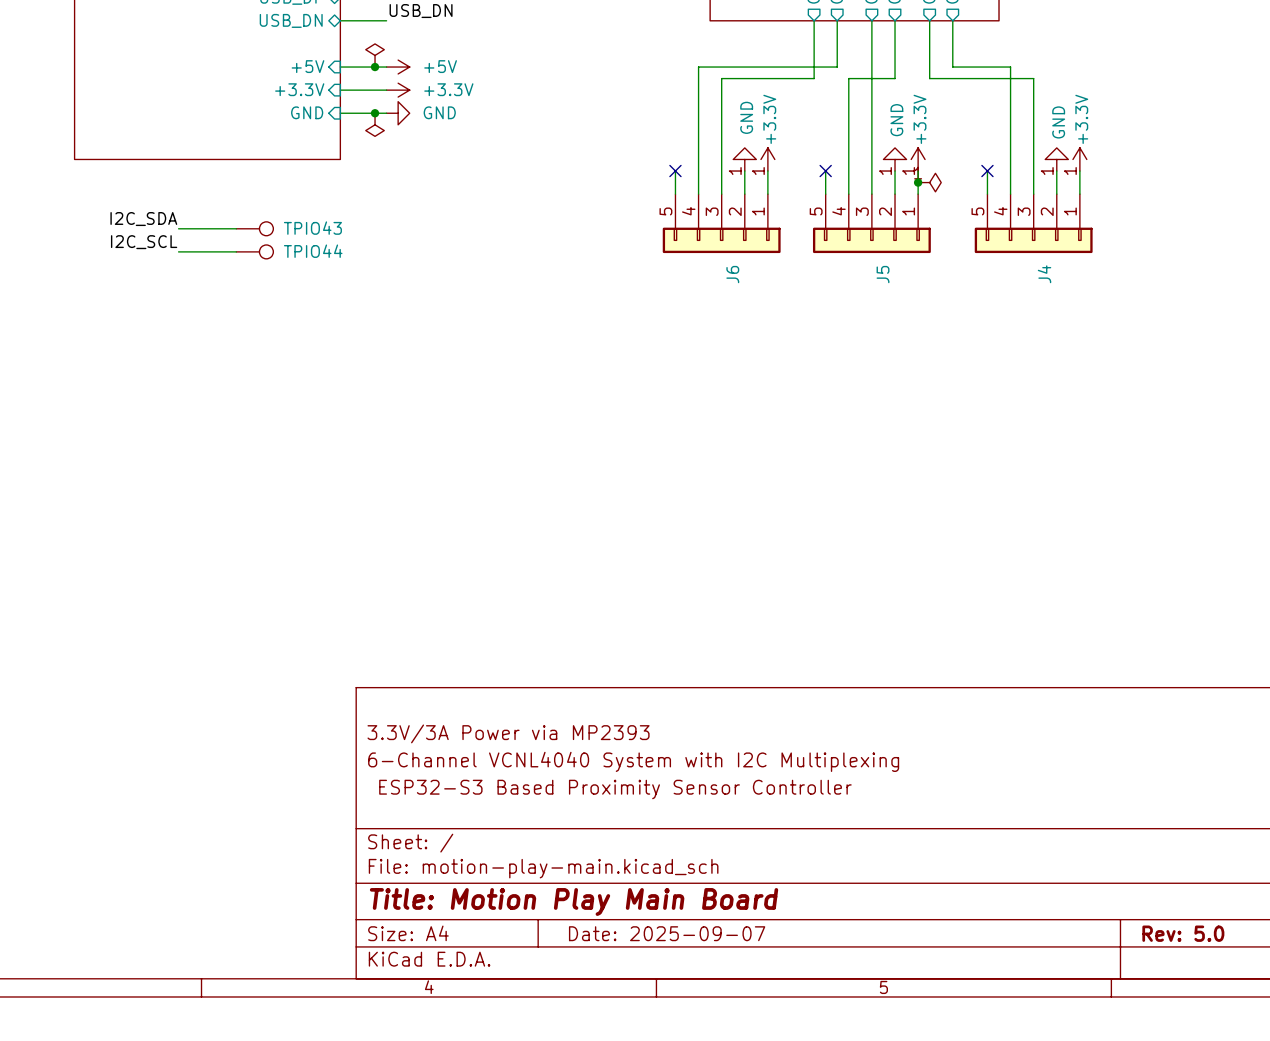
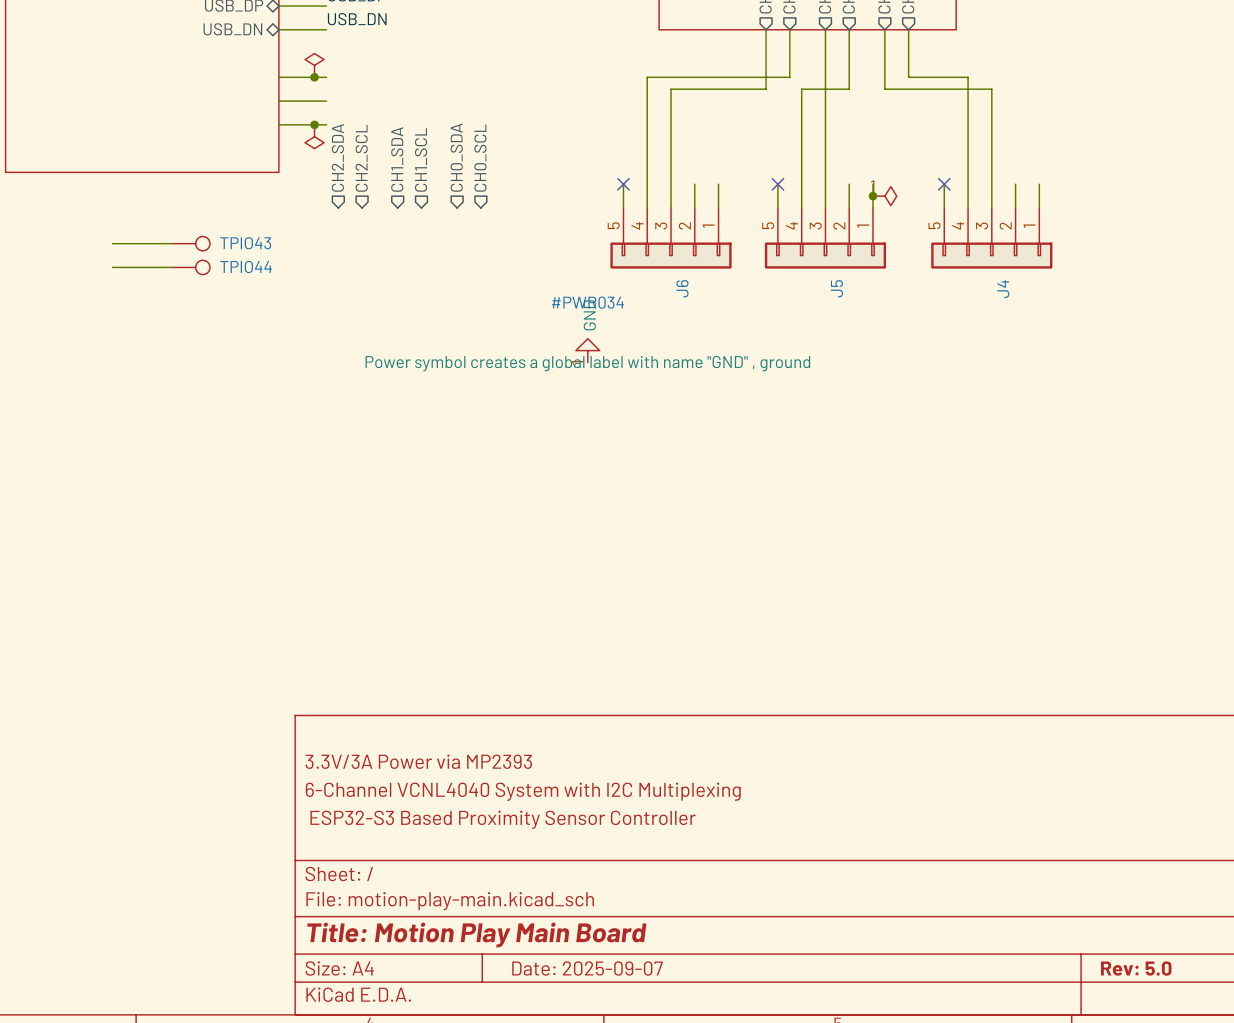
sheet pin: +5V (307, 66) -> none
power symbol: +5V (398, 67) -> none
sheet pin: +3.3V (299, 89) -> none
power symbol: +3.3V (398, 90) -> none
sheet pin: GND (307, 112) -> none
power symbol: GND (398, 113) -> none
sheet pin: none -> CH2_SDA (337, 157)
sheet pin: none -> CH2_SCL (361, 158)
sheet pin: none -> CH1_SDA (397, 159)
sheet pin: none -> CH1_SCL (421, 159)
sheet pin: none -> CH0_SDA (456, 157)
sheet pin: none -> CH0_SCL (480, 158)
power symbol: GND (744, 159) -> none
power symbol: +3.3V (767, 159) -> none
power symbol: GND (895, 159) -> none
power symbol: +3.3V (918, 159) -> none
power symbol: GND (1056, 159) -> none
power symbol: +3.3V (1079, 159) -> none
label: I2C_SDA (143, 219) -> none
label: I2C_SCL (144, 242) -> none
#PWR034: none -> GND (587, 350)

